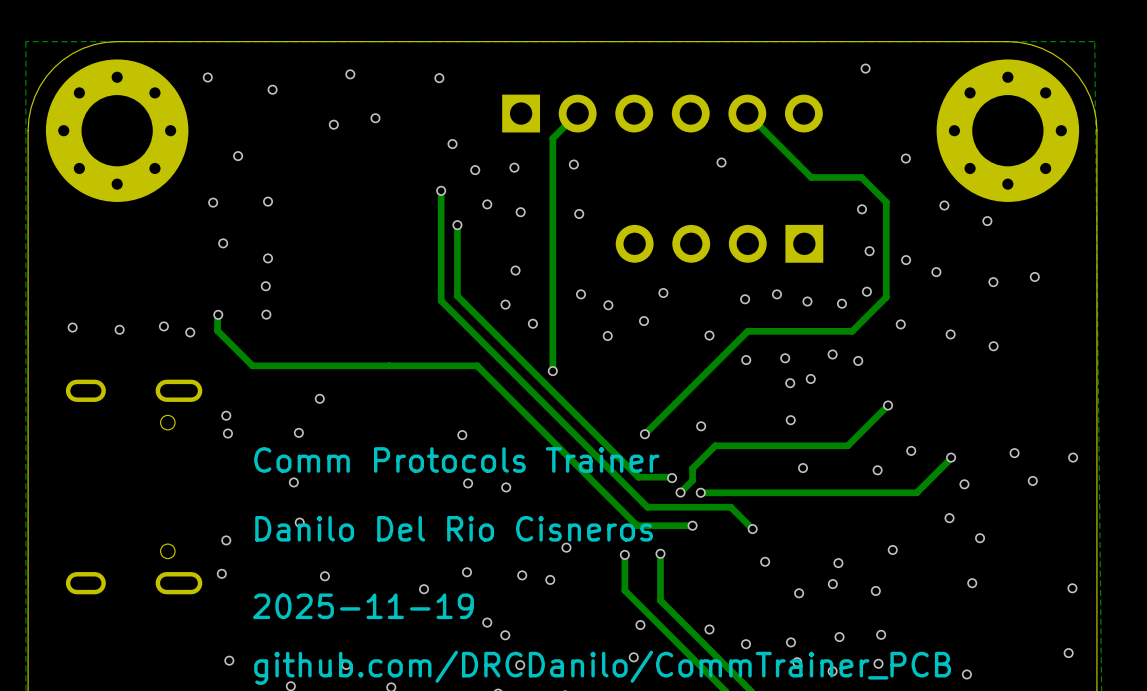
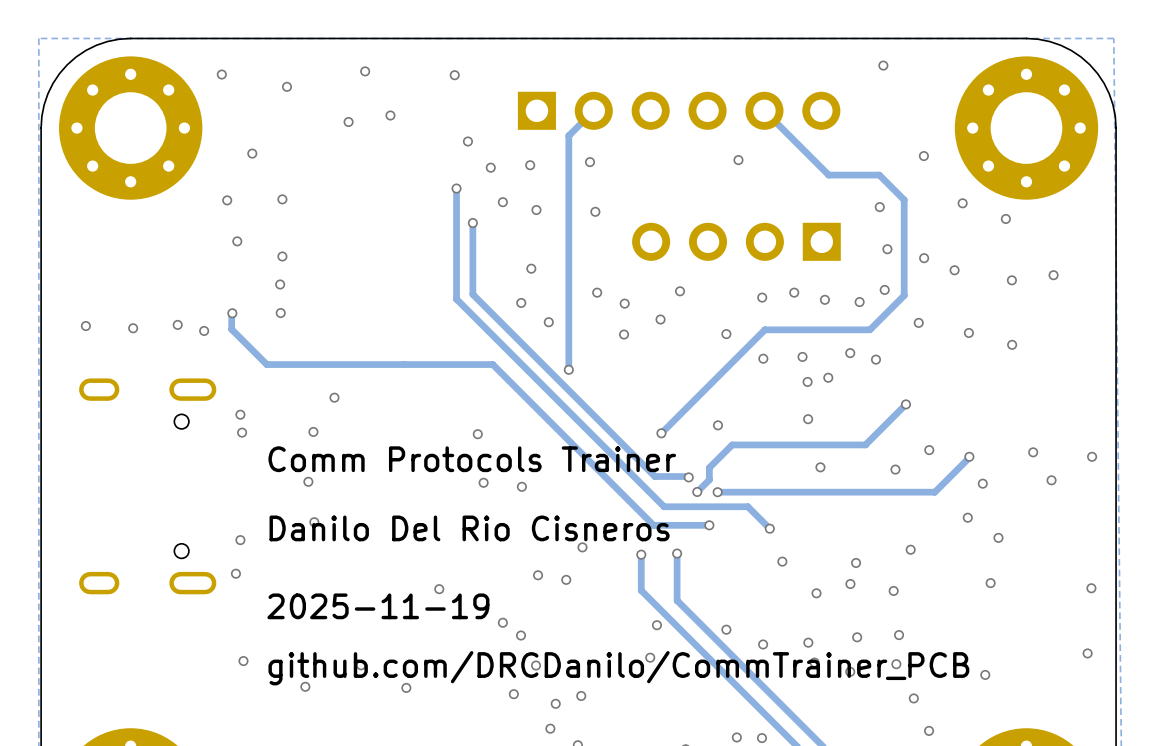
via: (466, 572) -> none
via: (324, 576) -> none

